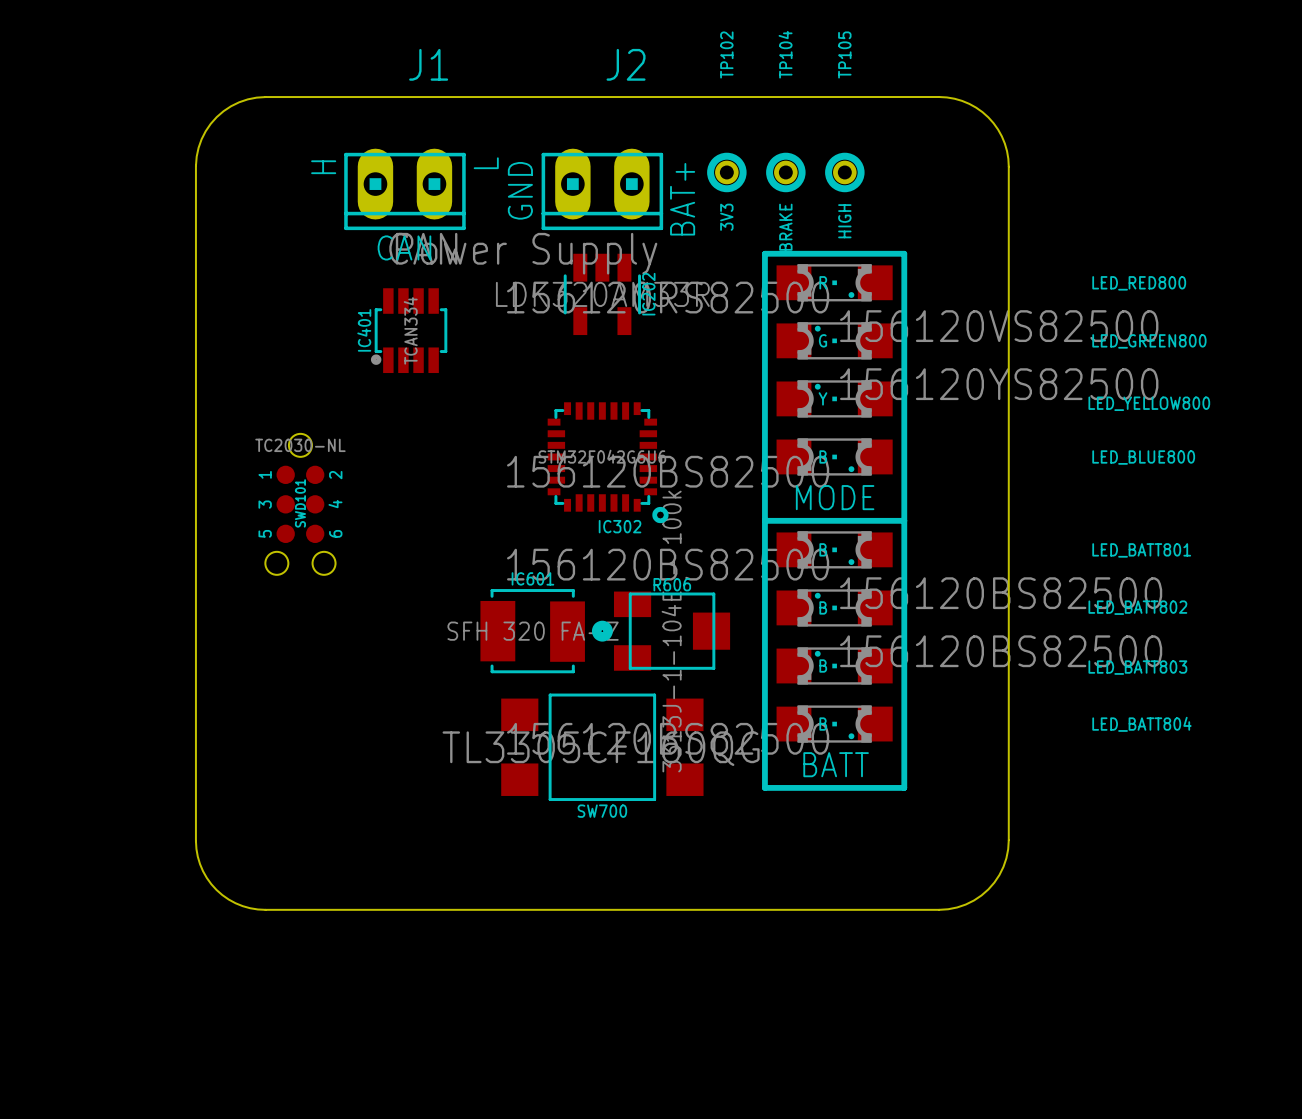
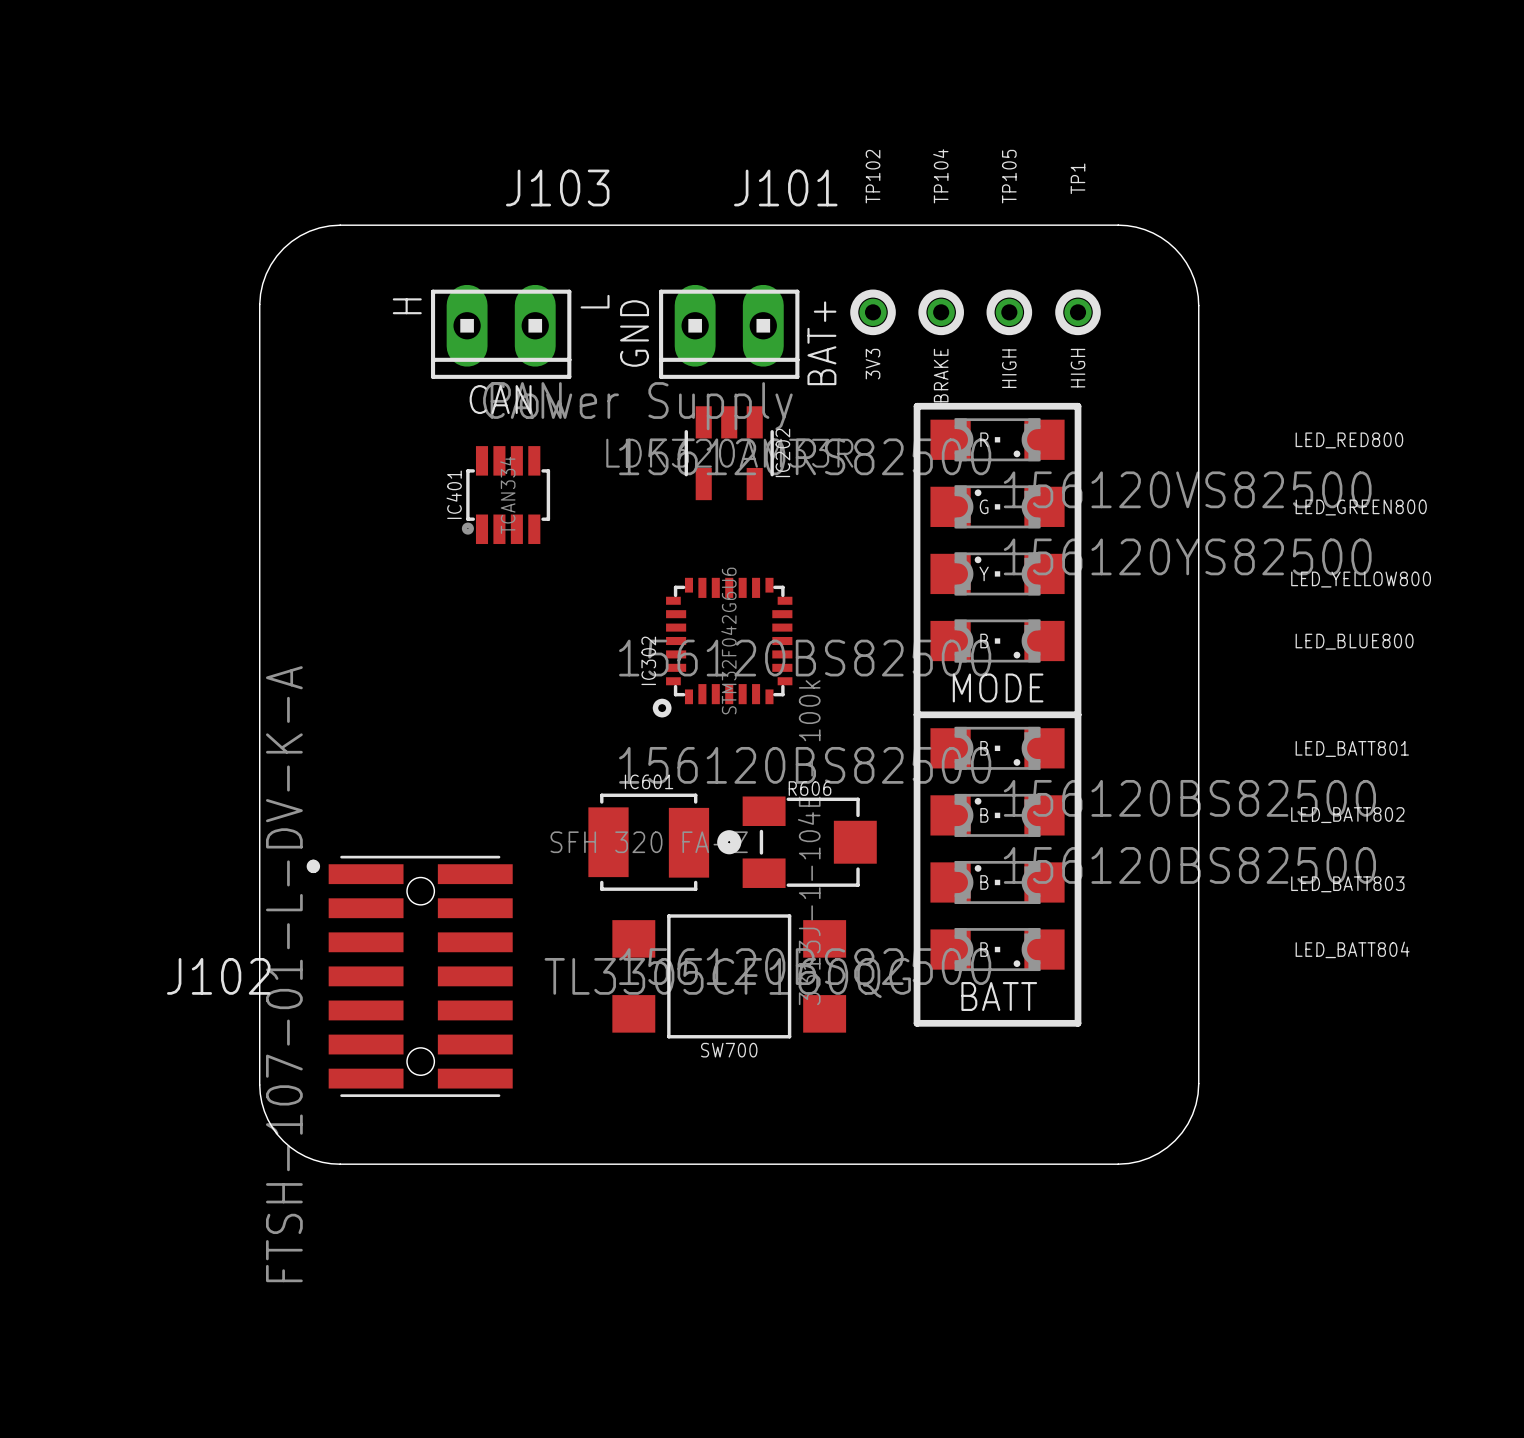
J1 name: J1 (428, 64) -> J103 (557, 187)
J2 name: J2 (626, 64) -> J101 (785, 187)
TP1: none -> (1078, 312)
text: none -> HIGH (1078, 368)
IC302 rotation: 0° (608, 462) -> 90° clockwise (722, 647)
SWD101: TC2030-NL (300, 504) -> none
R606 footprint: [613, 591, 731, 671] -> [742, 796, 877, 888]
J102: none -> FTSH-107-01-L-DV-K-A (409, 976)

